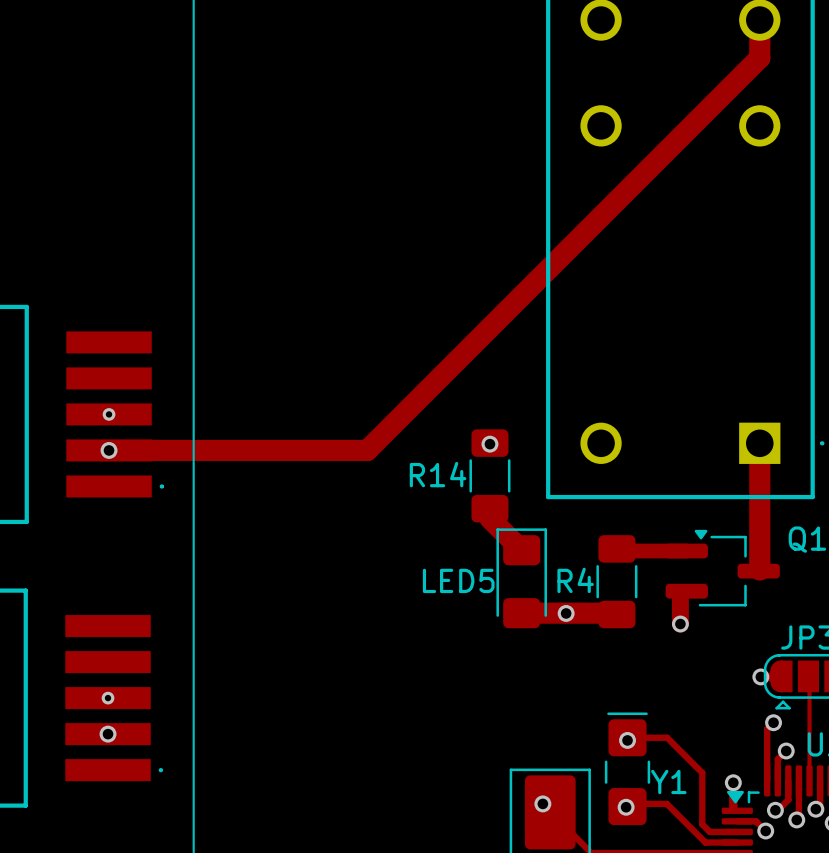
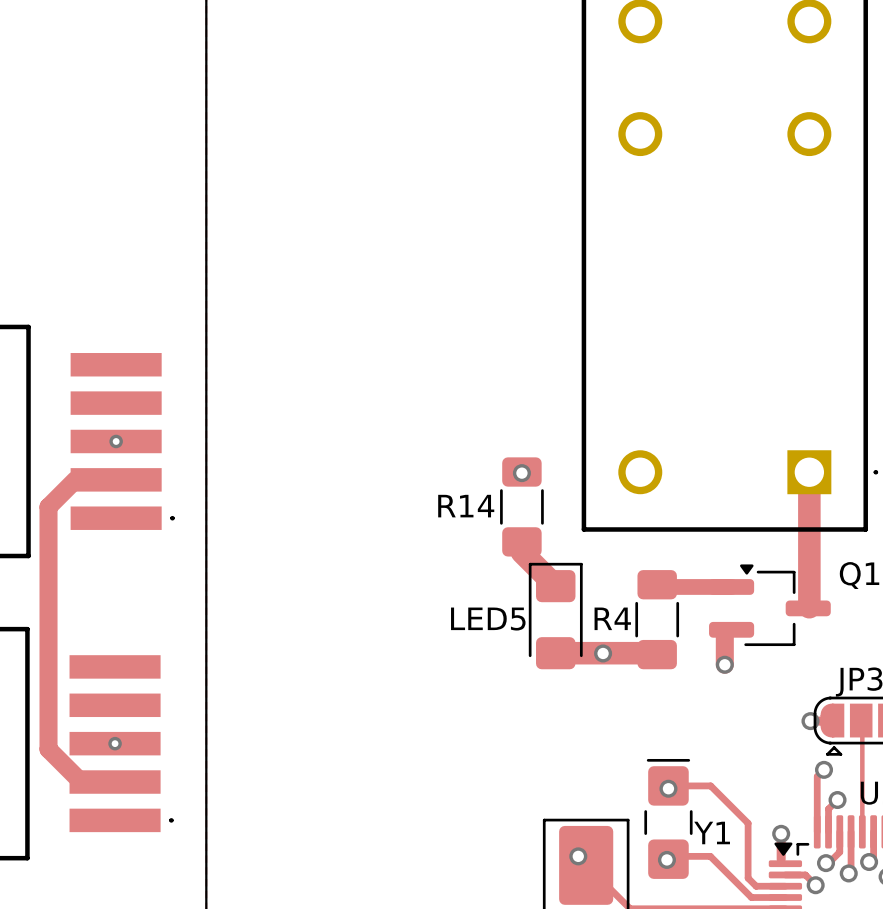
track: (759, 20) (759, 57) (367, 450) (109, 450) -> (115, 782) (81, 782) (48, 749) (48, 506) (75, 479) (116, 479)
via: (109, 450) -> none
via: (108, 734) -> none

